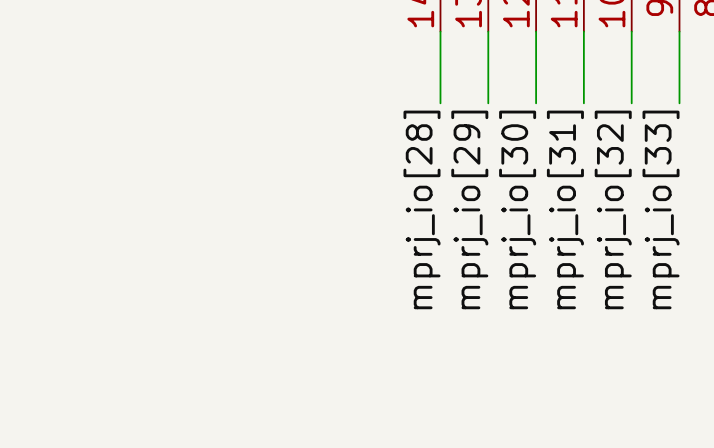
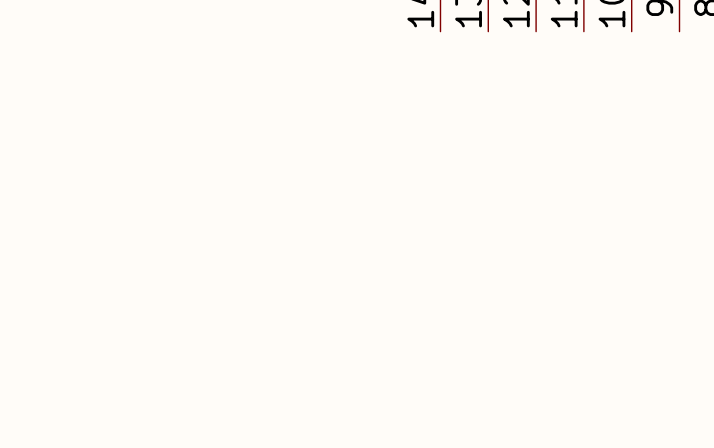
wire: (440, 31) (440, 103) -> none
wire: (488, 31) (488, 103) -> none
wire: (536, 31) (536, 103) -> none
wire: (583, 31) (583, 103) -> none
wire: (631, 31) (631, 103) -> none
wire: (679, 31) (679, 103) -> none
label: mprj_io[28] (422, 209) -> none
label: mprj_io[29] (469, 209) -> none
label: mprj_io[30] (517, 209) -> none
label: mprj_io[31] (565, 209) -> none
label: mprj_io[32] (613, 209) -> none
label: mprj_io[33] (661, 209) -> none

